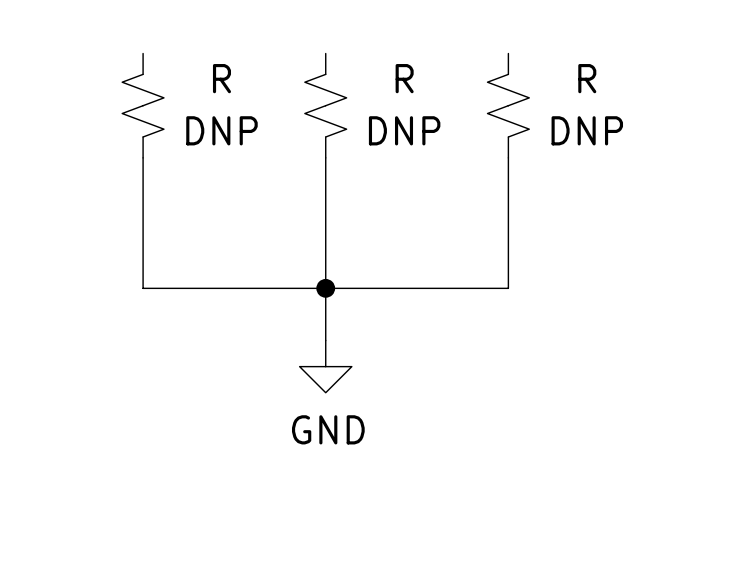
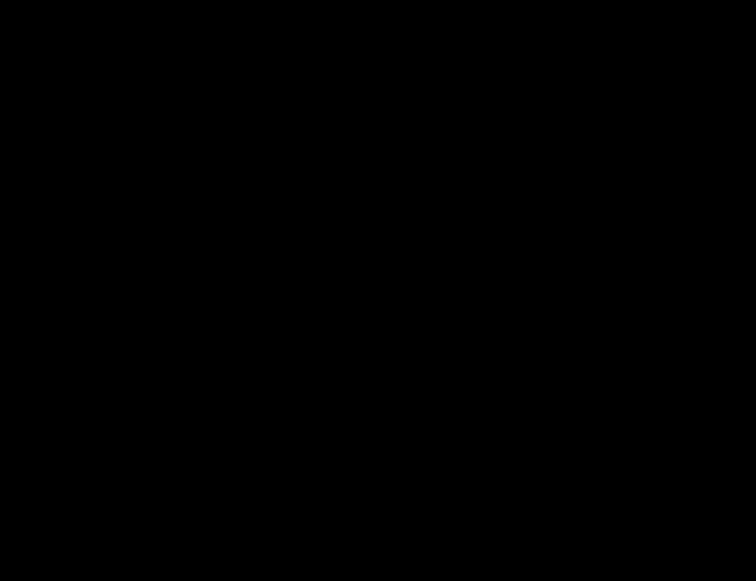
DNP: R (143, 105) -> none
DNP: R (325, 105) -> none
DNP: R (508, 105) -> none
wire: (143, 157) (143, 288) (508, 288) (508, 157) -> none
wire: (325, 157) (325, 340) -> none
junction: (325, 288) -> none
power symbol: GND (325, 366) -> none

